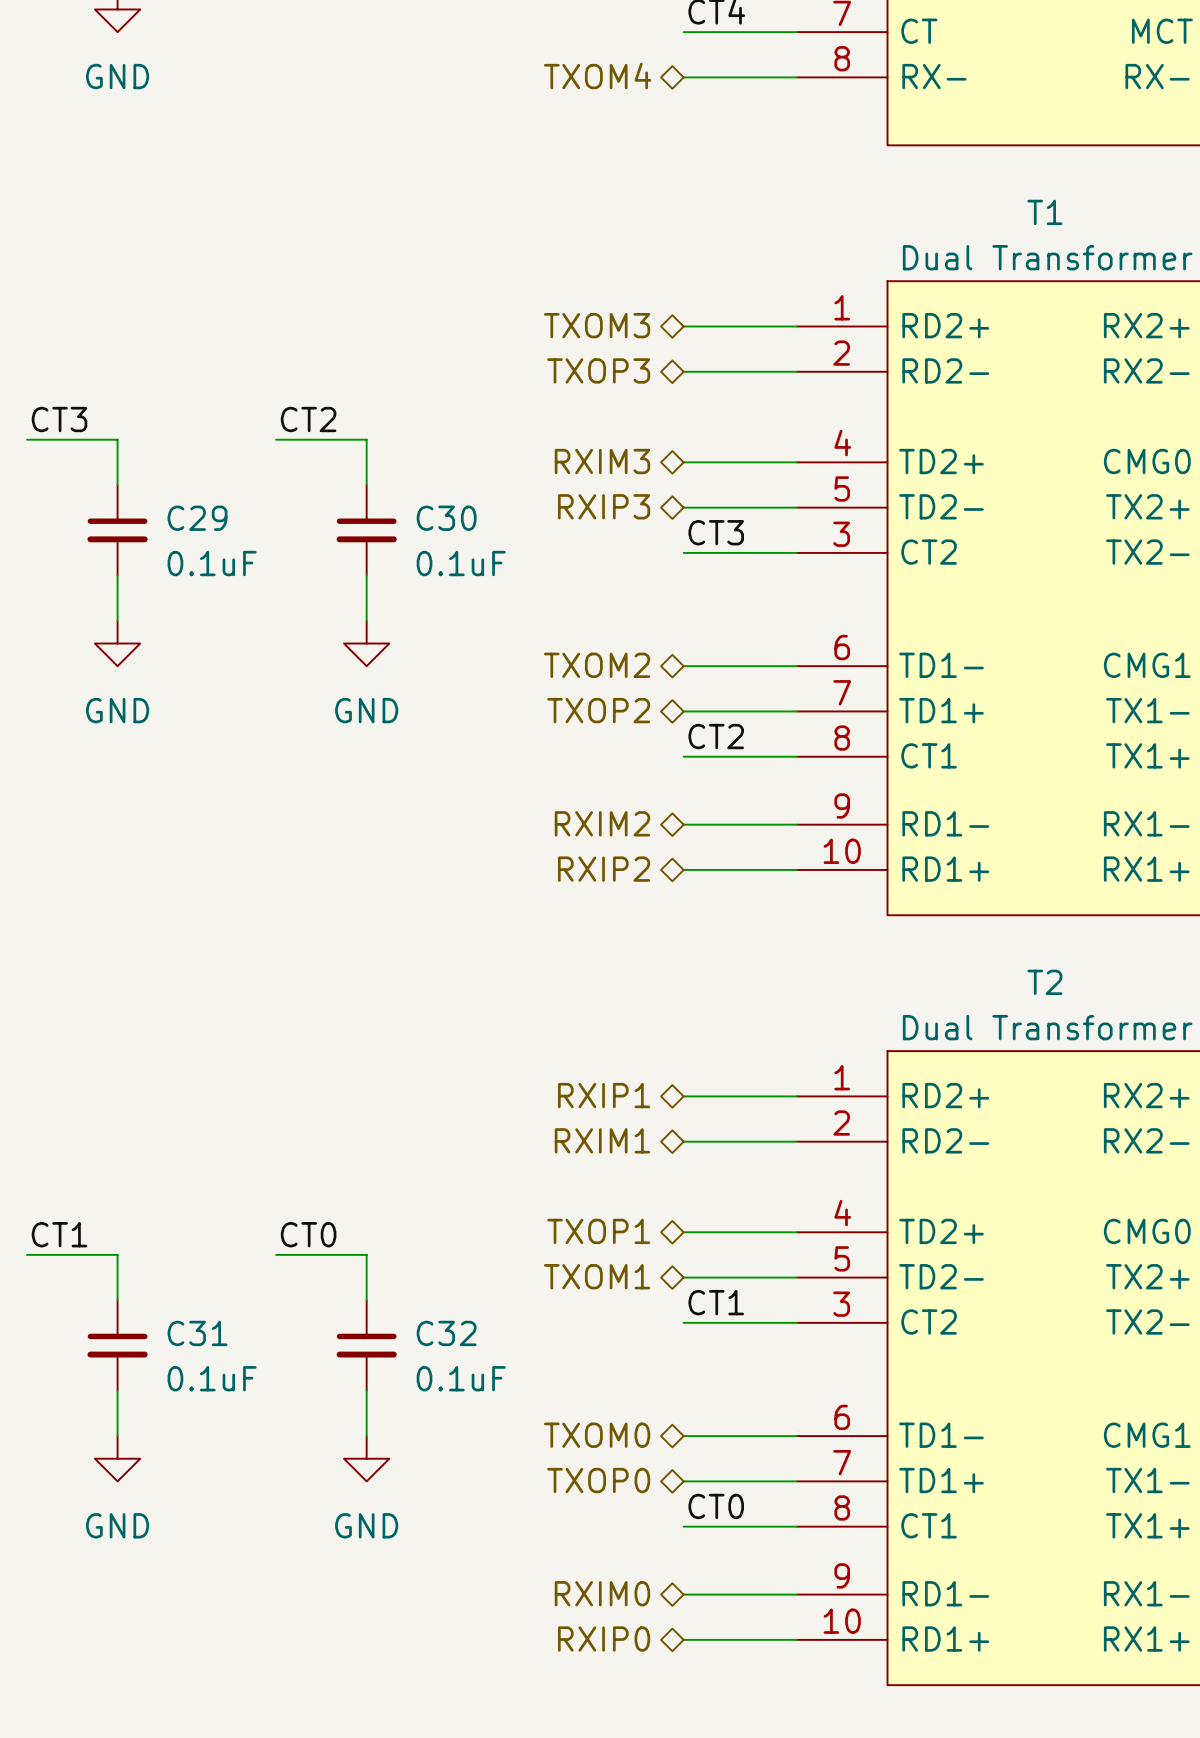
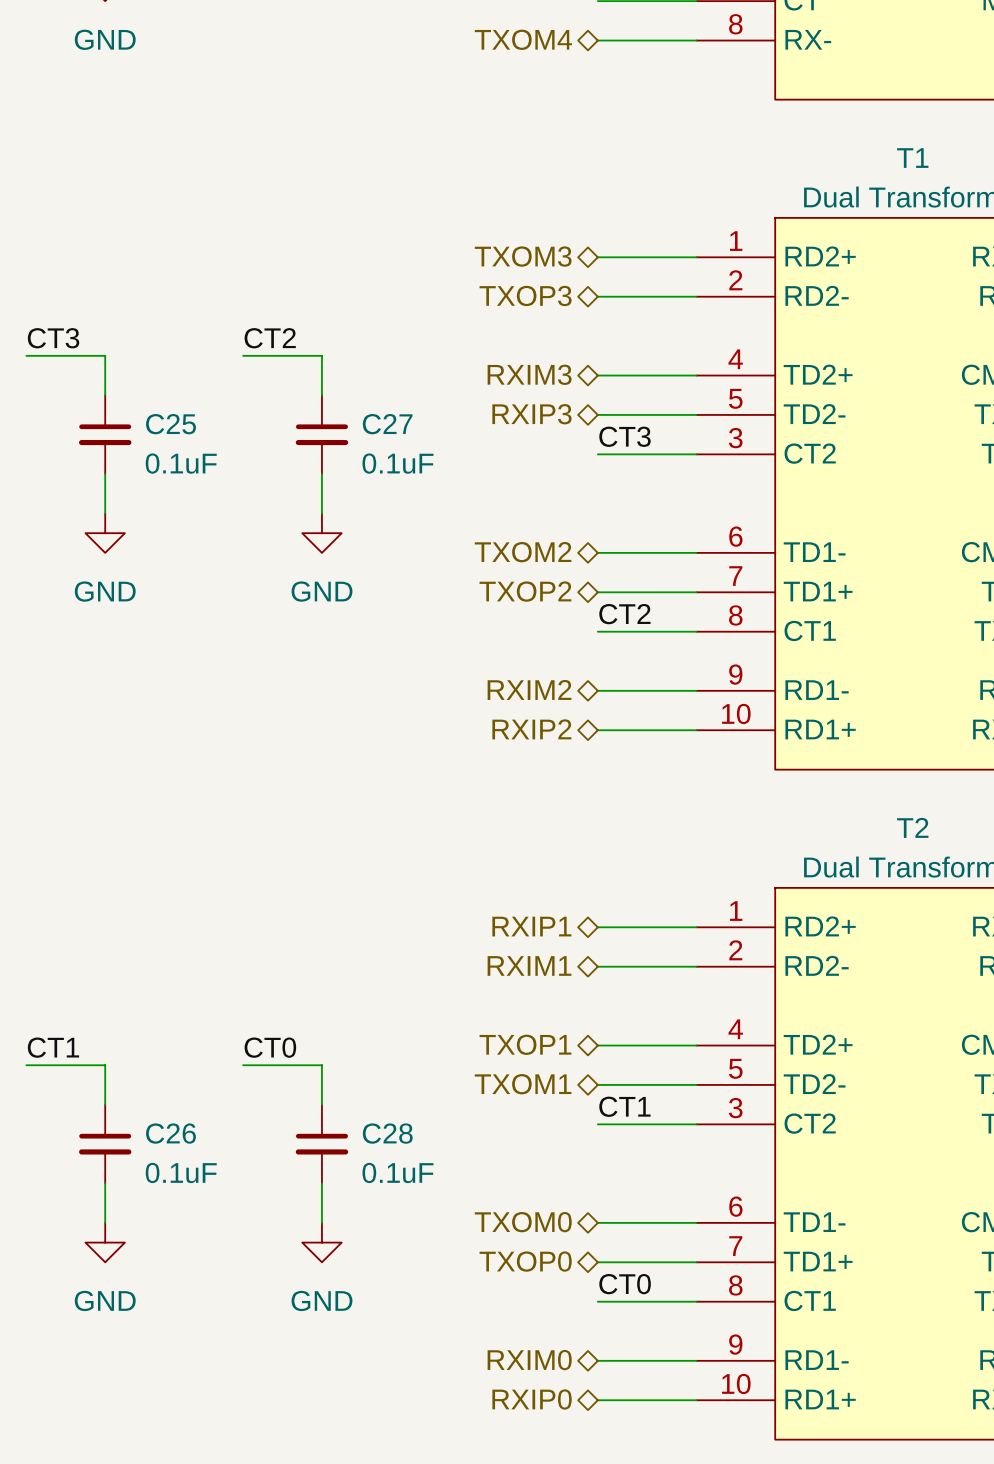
C29 name: C29 (197, 518) -> C25 (171, 424)
C30 name: C30 (446, 518) -> C27 (387, 424)
C31 name: C31 (197, 1333) -> C26 (170, 1133)
C32 name: C32 (446, 1333) -> C28 (387, 1133)

